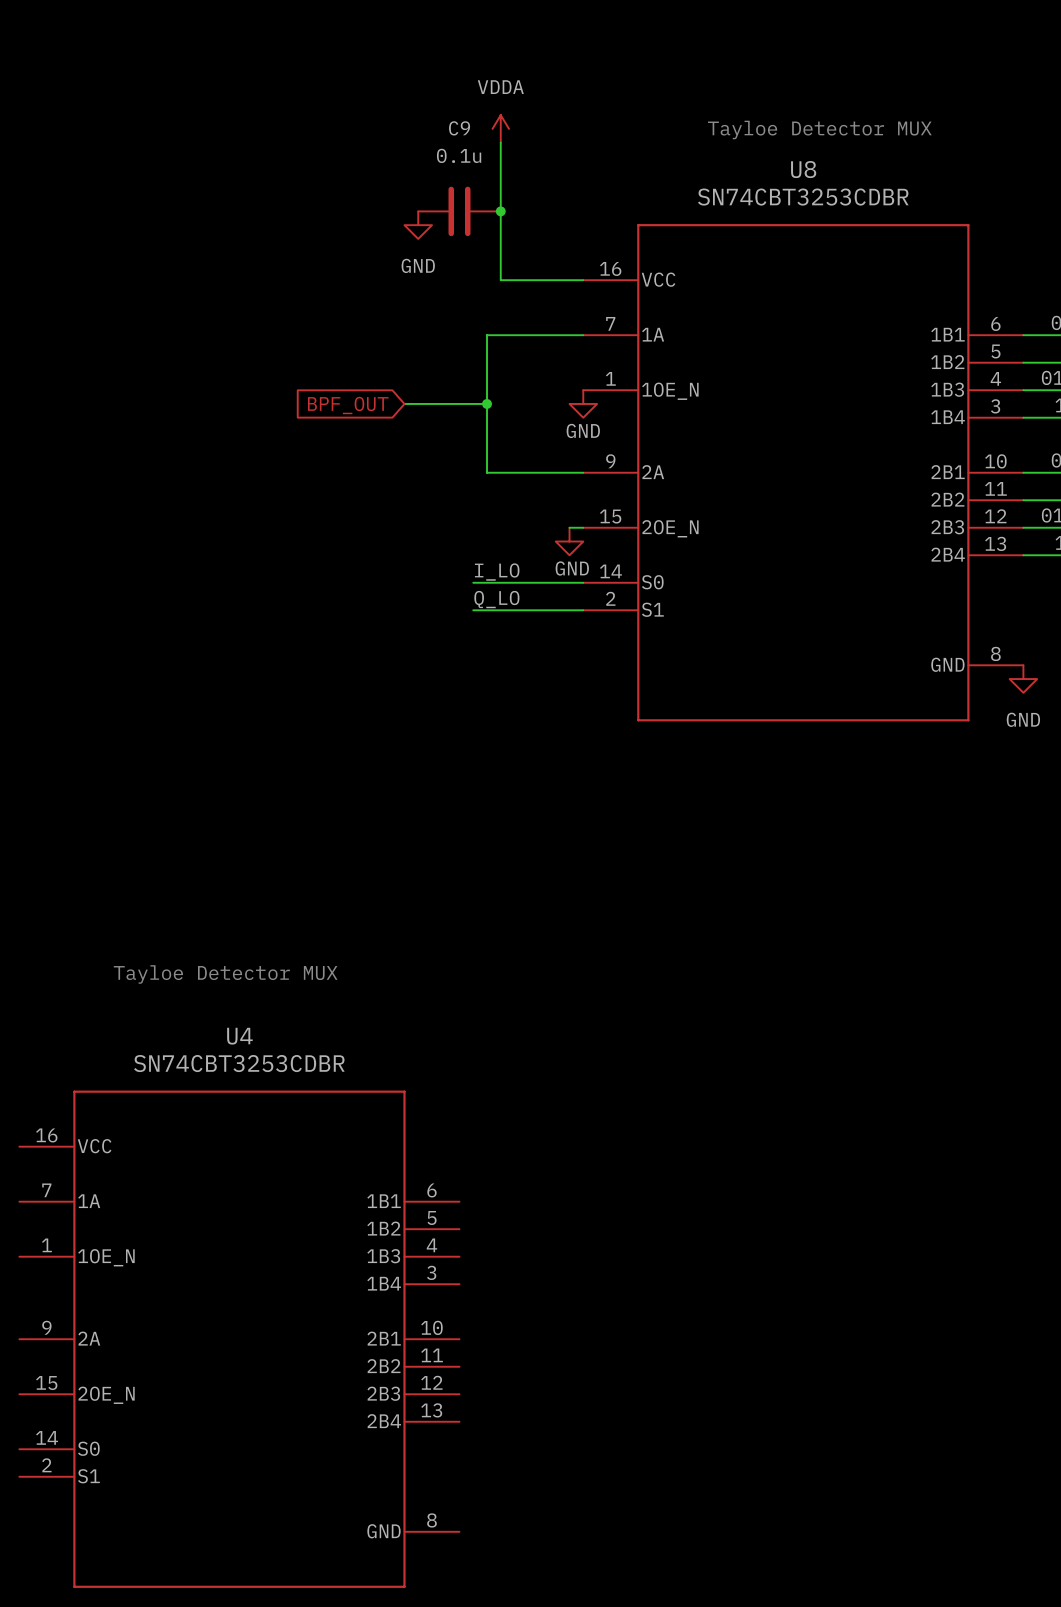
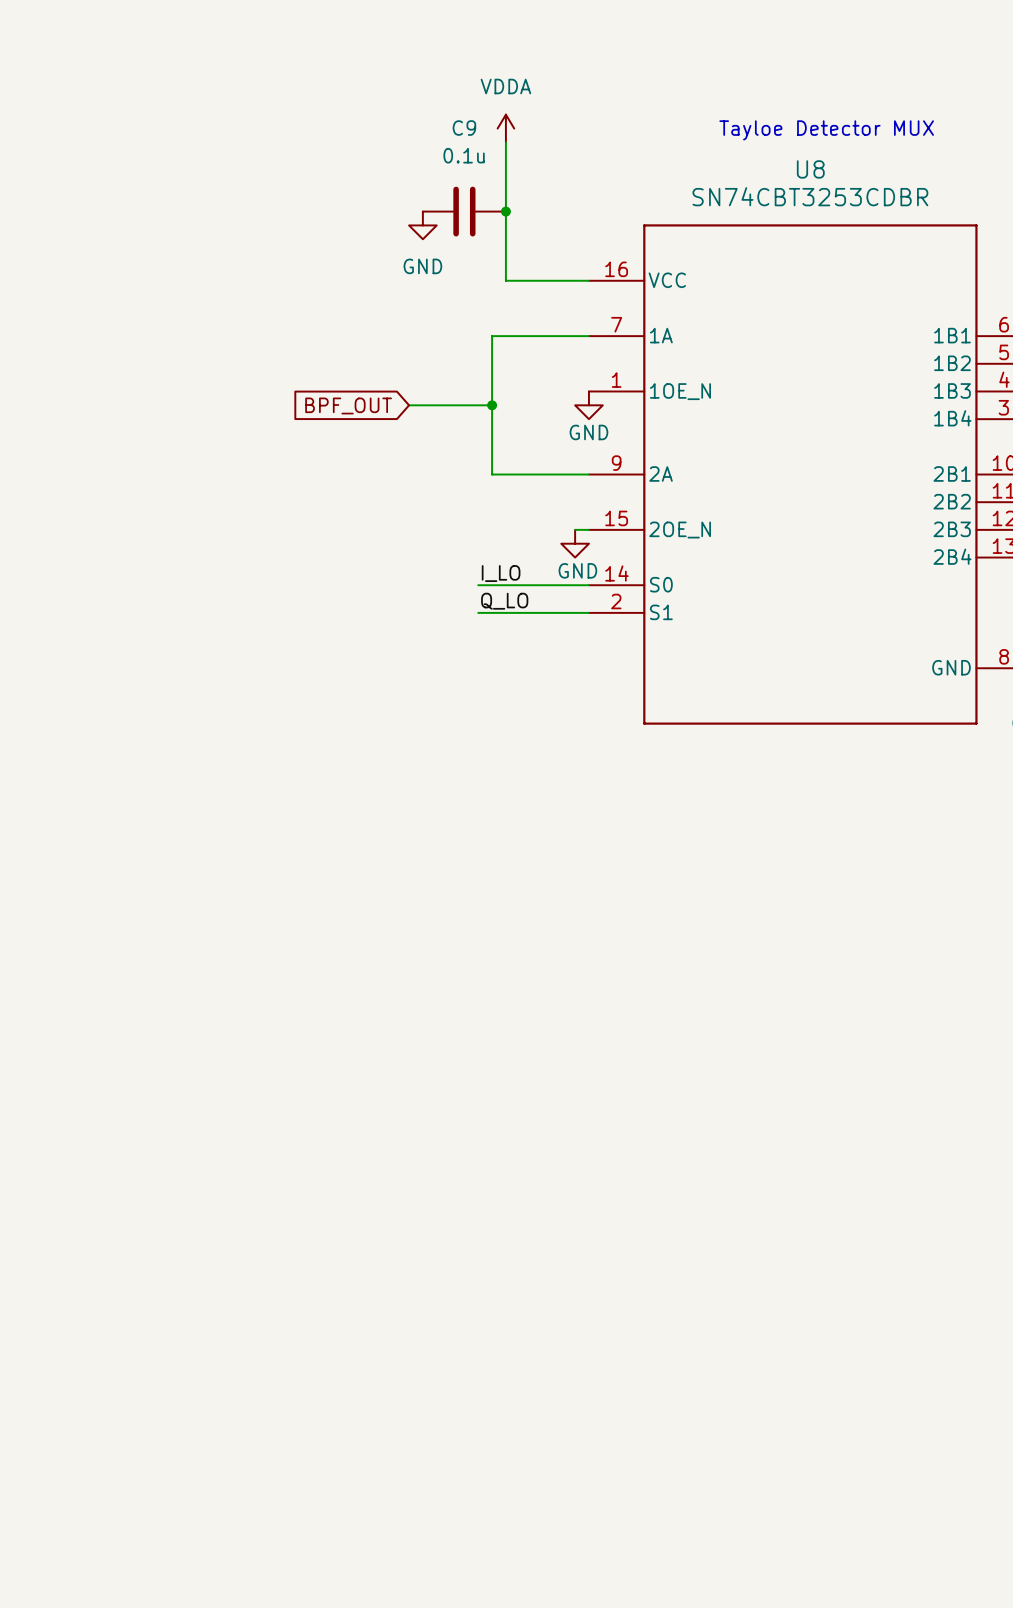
text: Tayloe Detector MUX (225, 974) -> none
U4: SN74CBT3253CDBR (239, 1339) -> none

